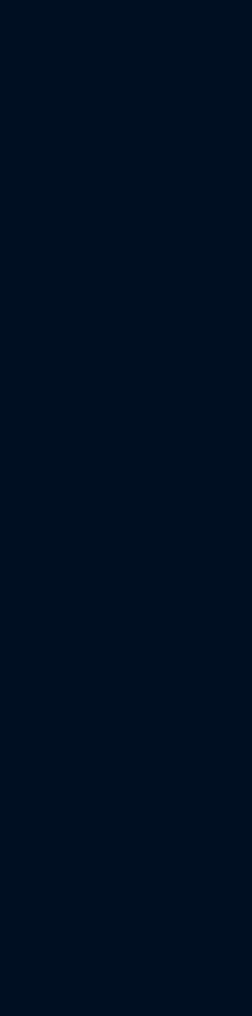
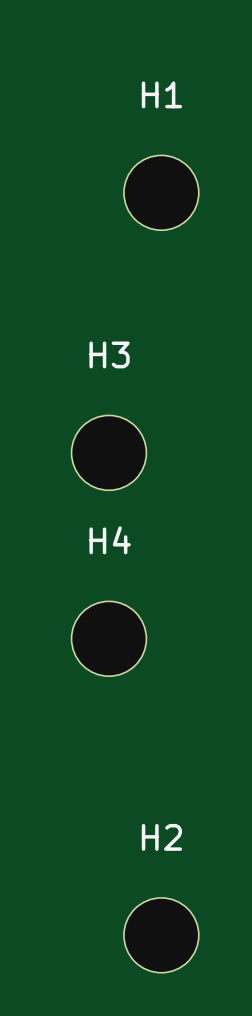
H1: none -> (161, 192)
H3: none -> (108, 452)
H4: none -> (108, 638)
H2: none -> (161, 935)

